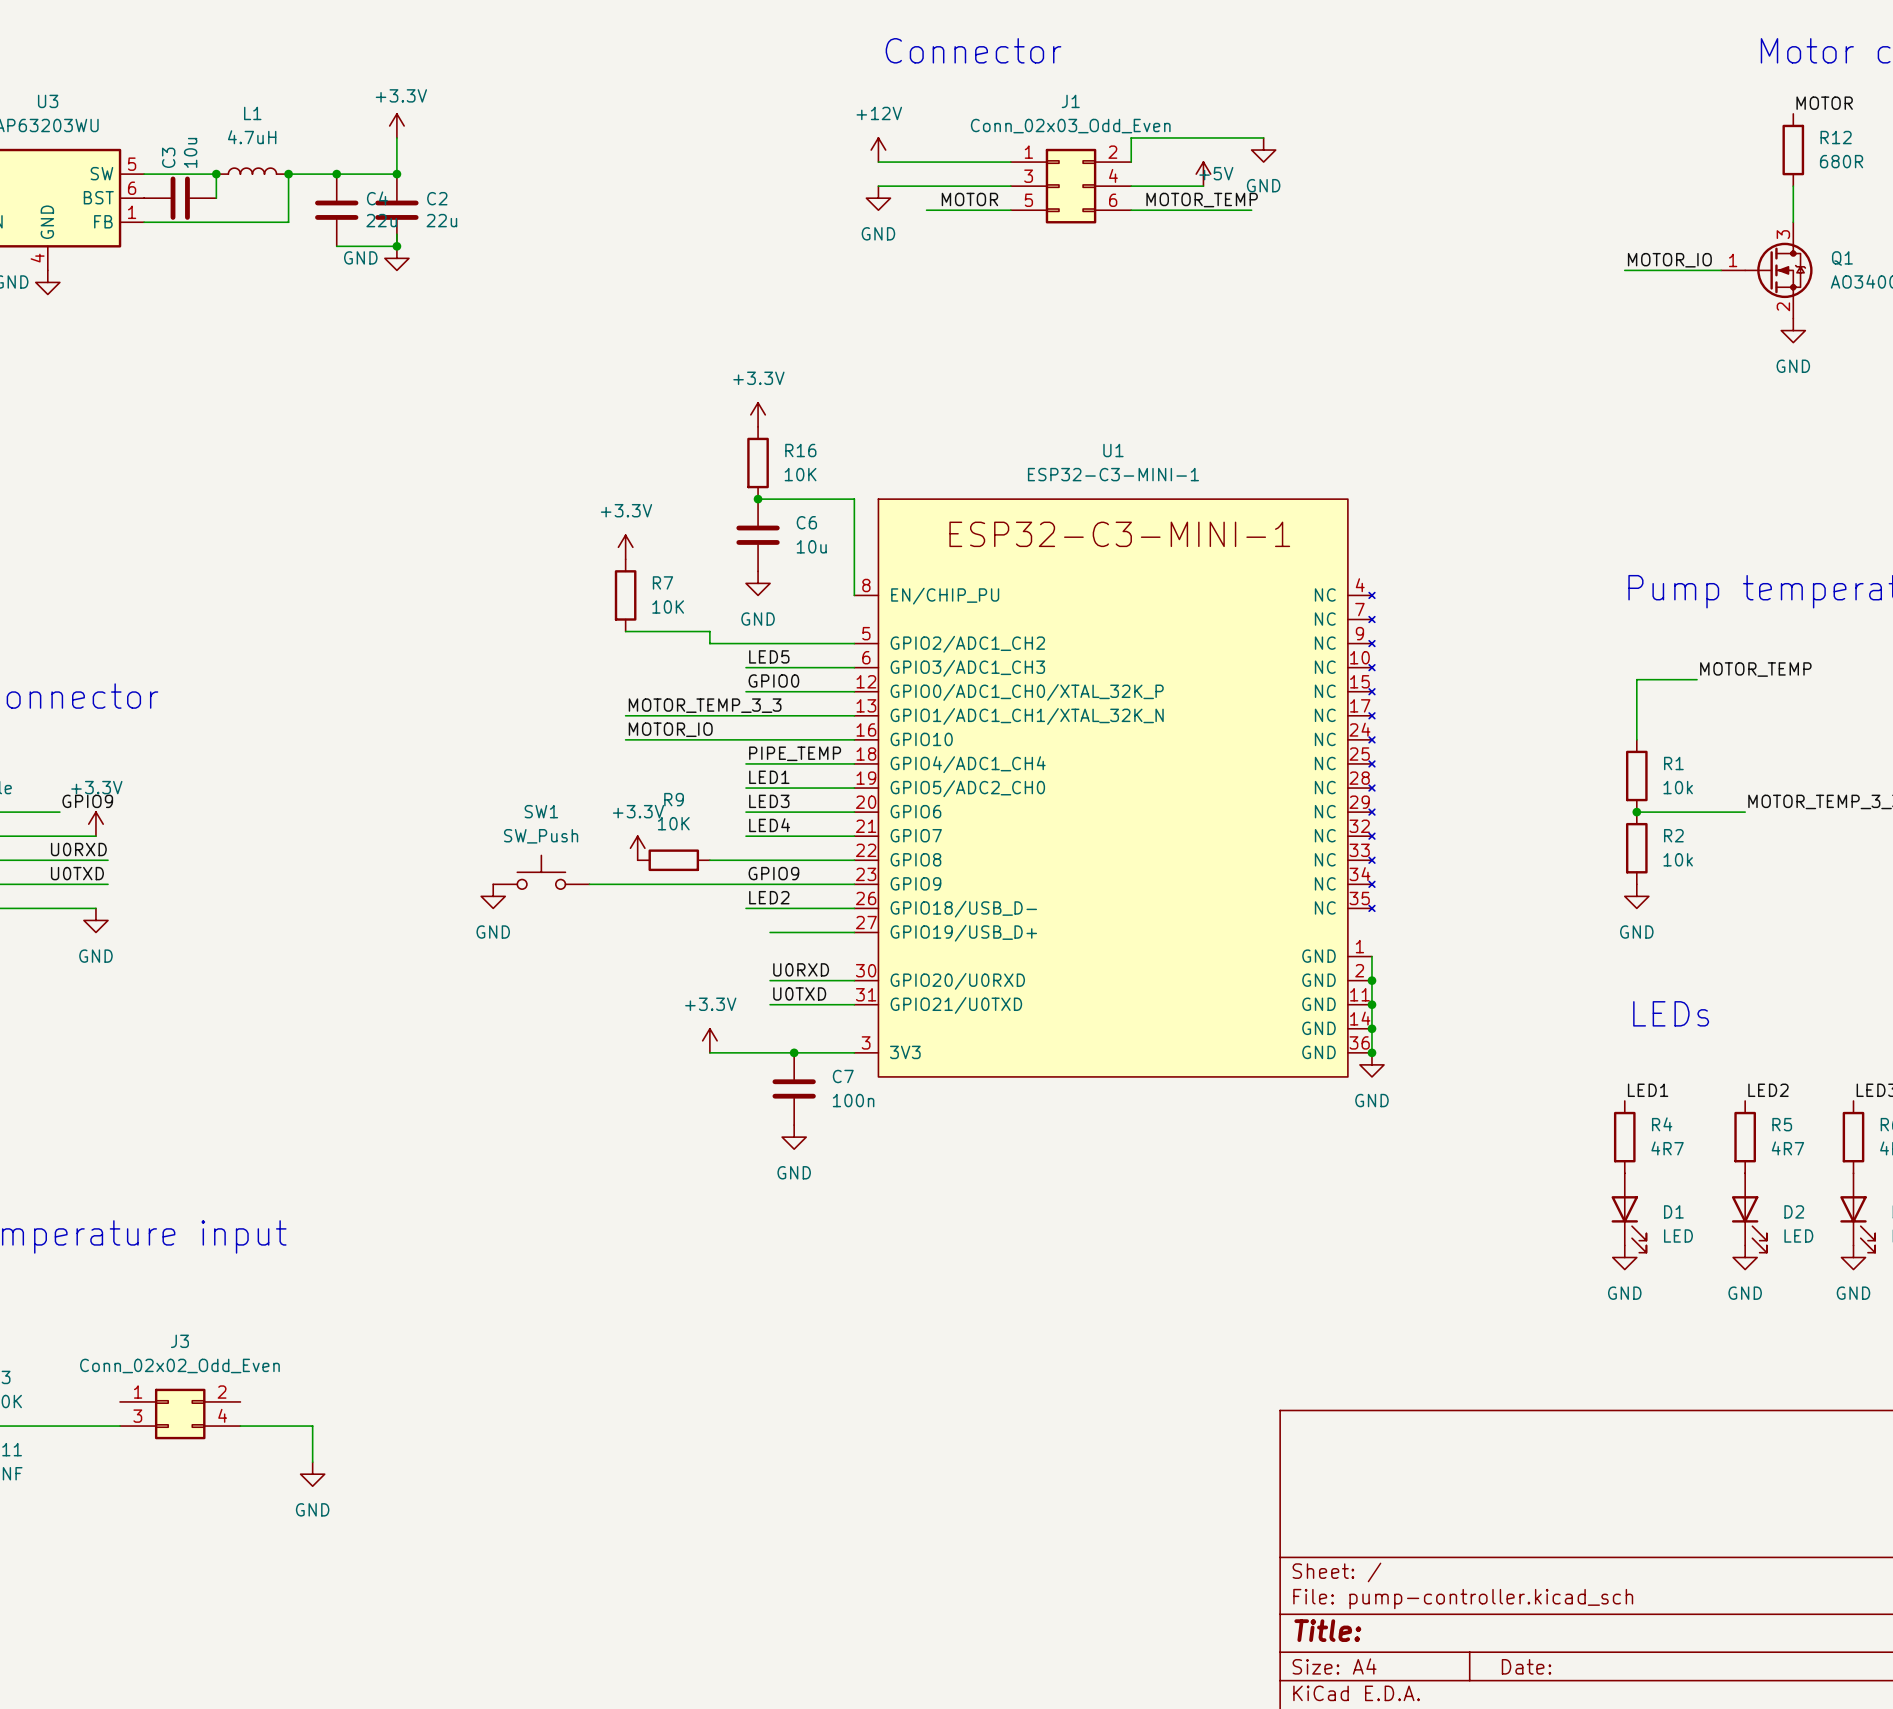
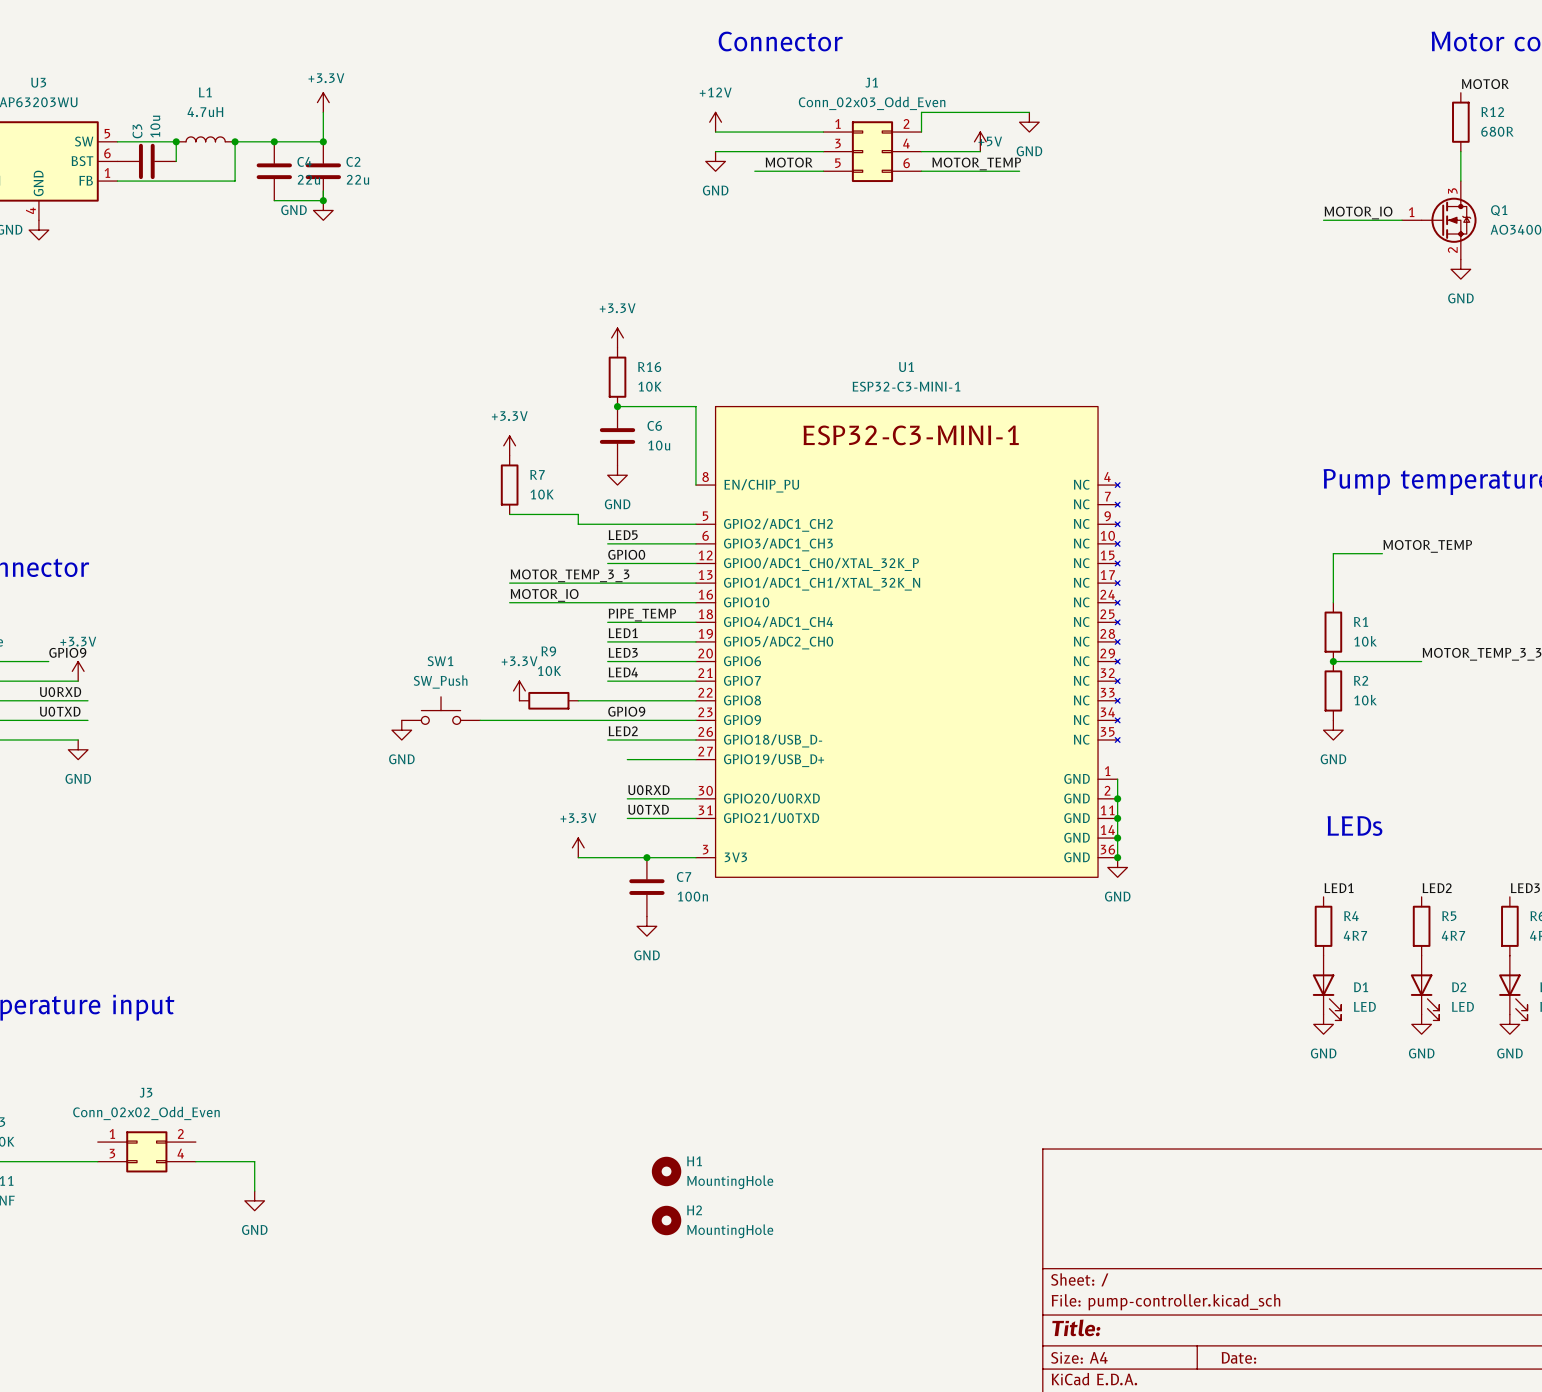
H1: none -> MountingHole (666, 1171)
H2: none -> MountingHole (666, 1220)

